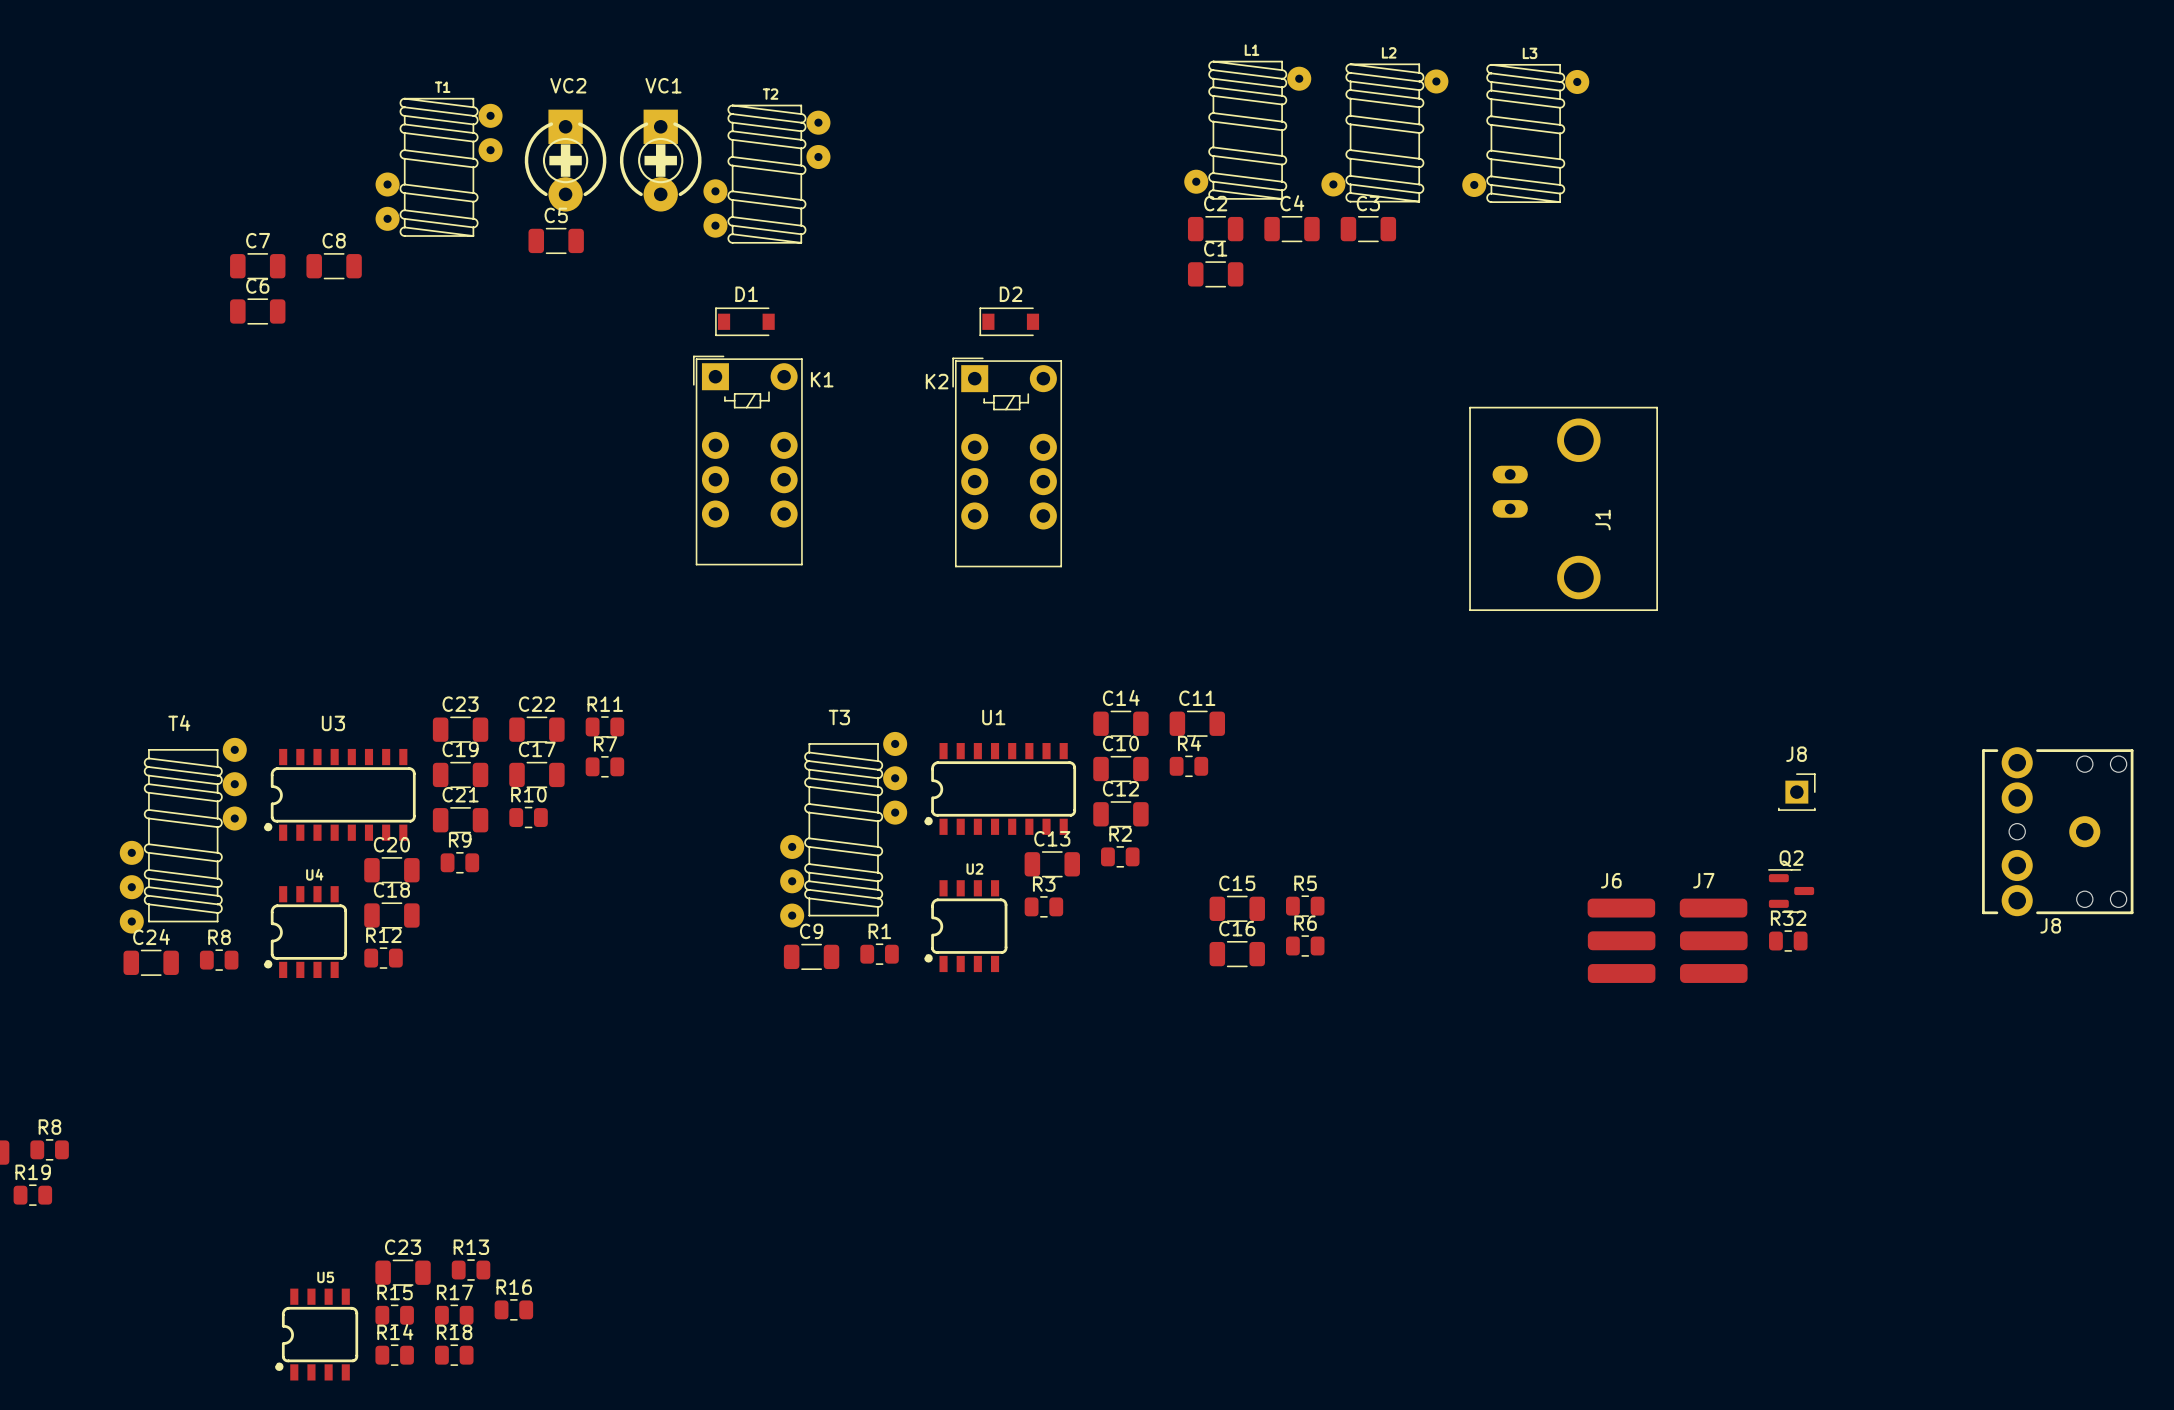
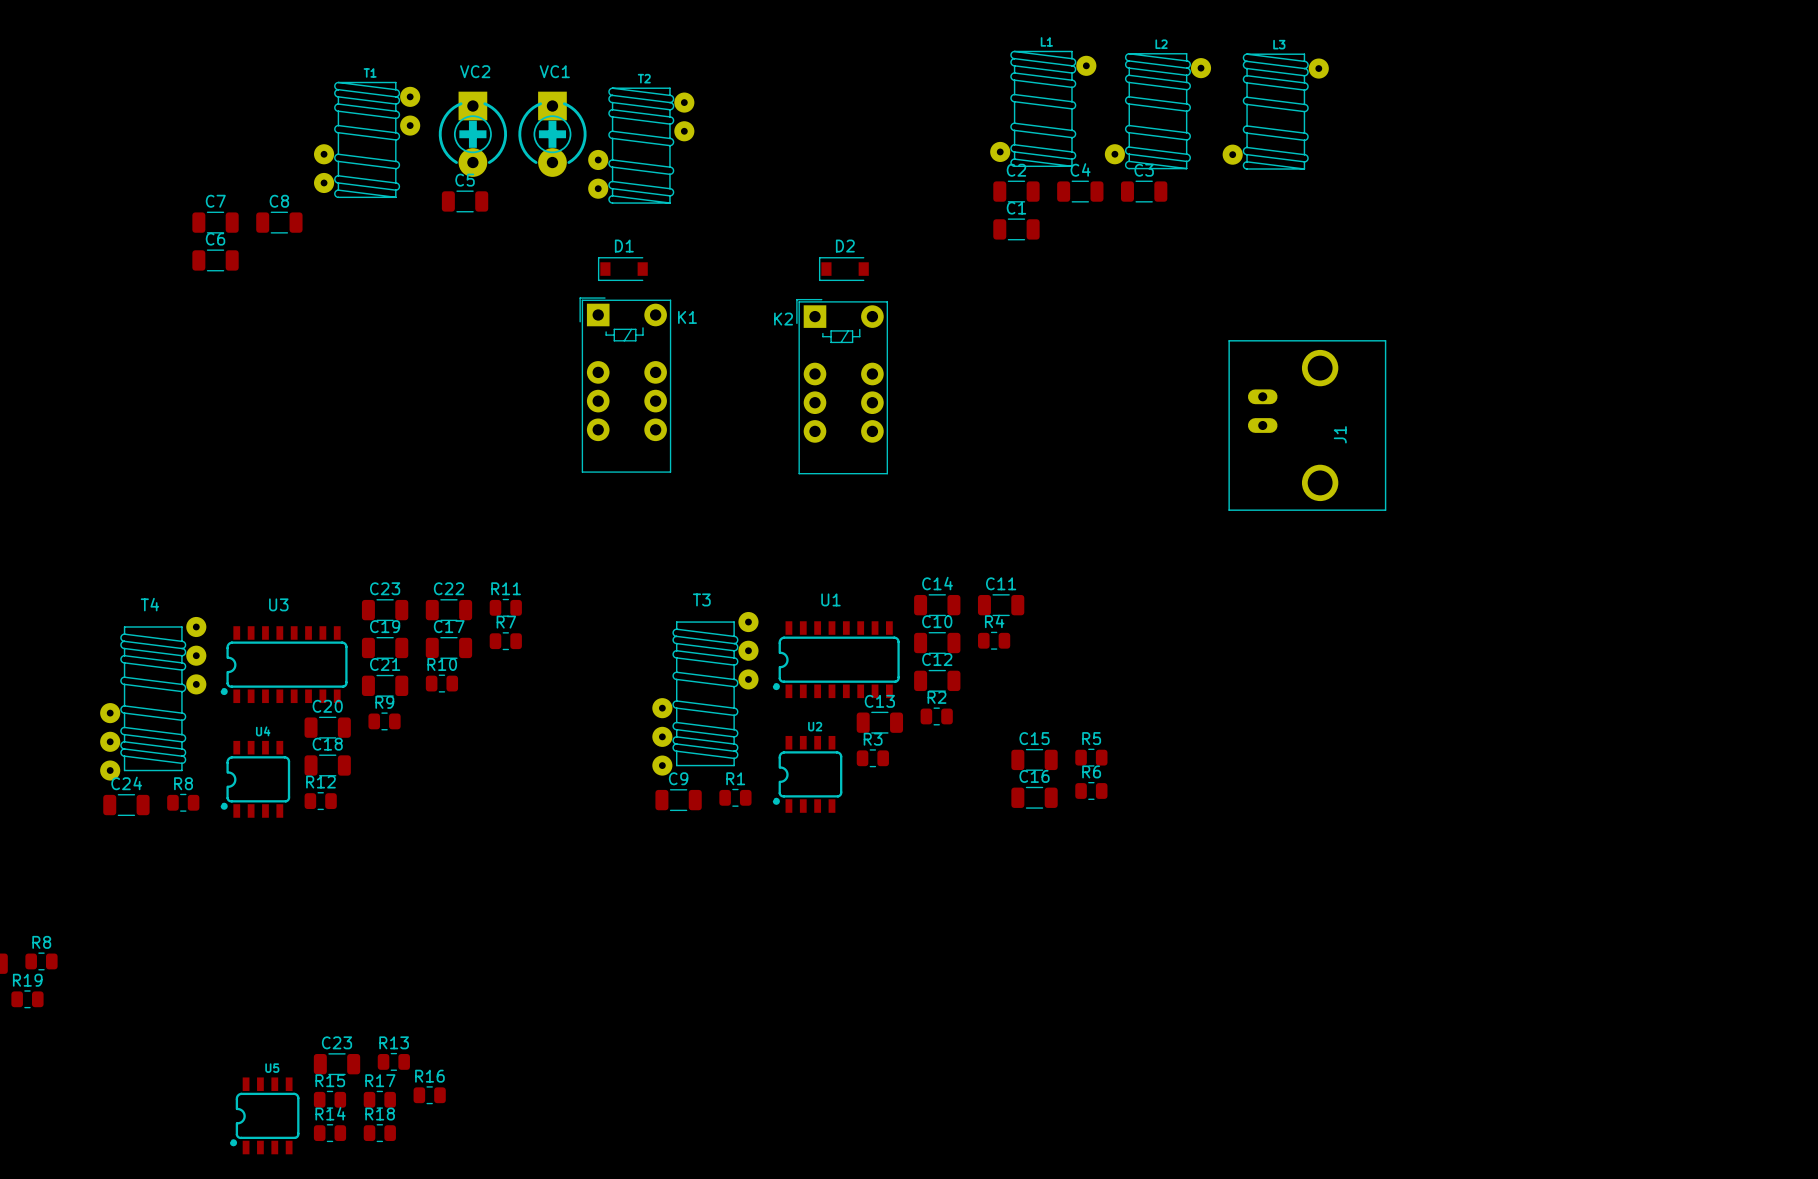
J8: (1796, 792) -> none
J8: (2057, 831) -> none
Q2: (1791, 891) -> none
J6: (1621, 940) -> none
J7: (1713, 940) -> none
R32: (1788, 941) -> none

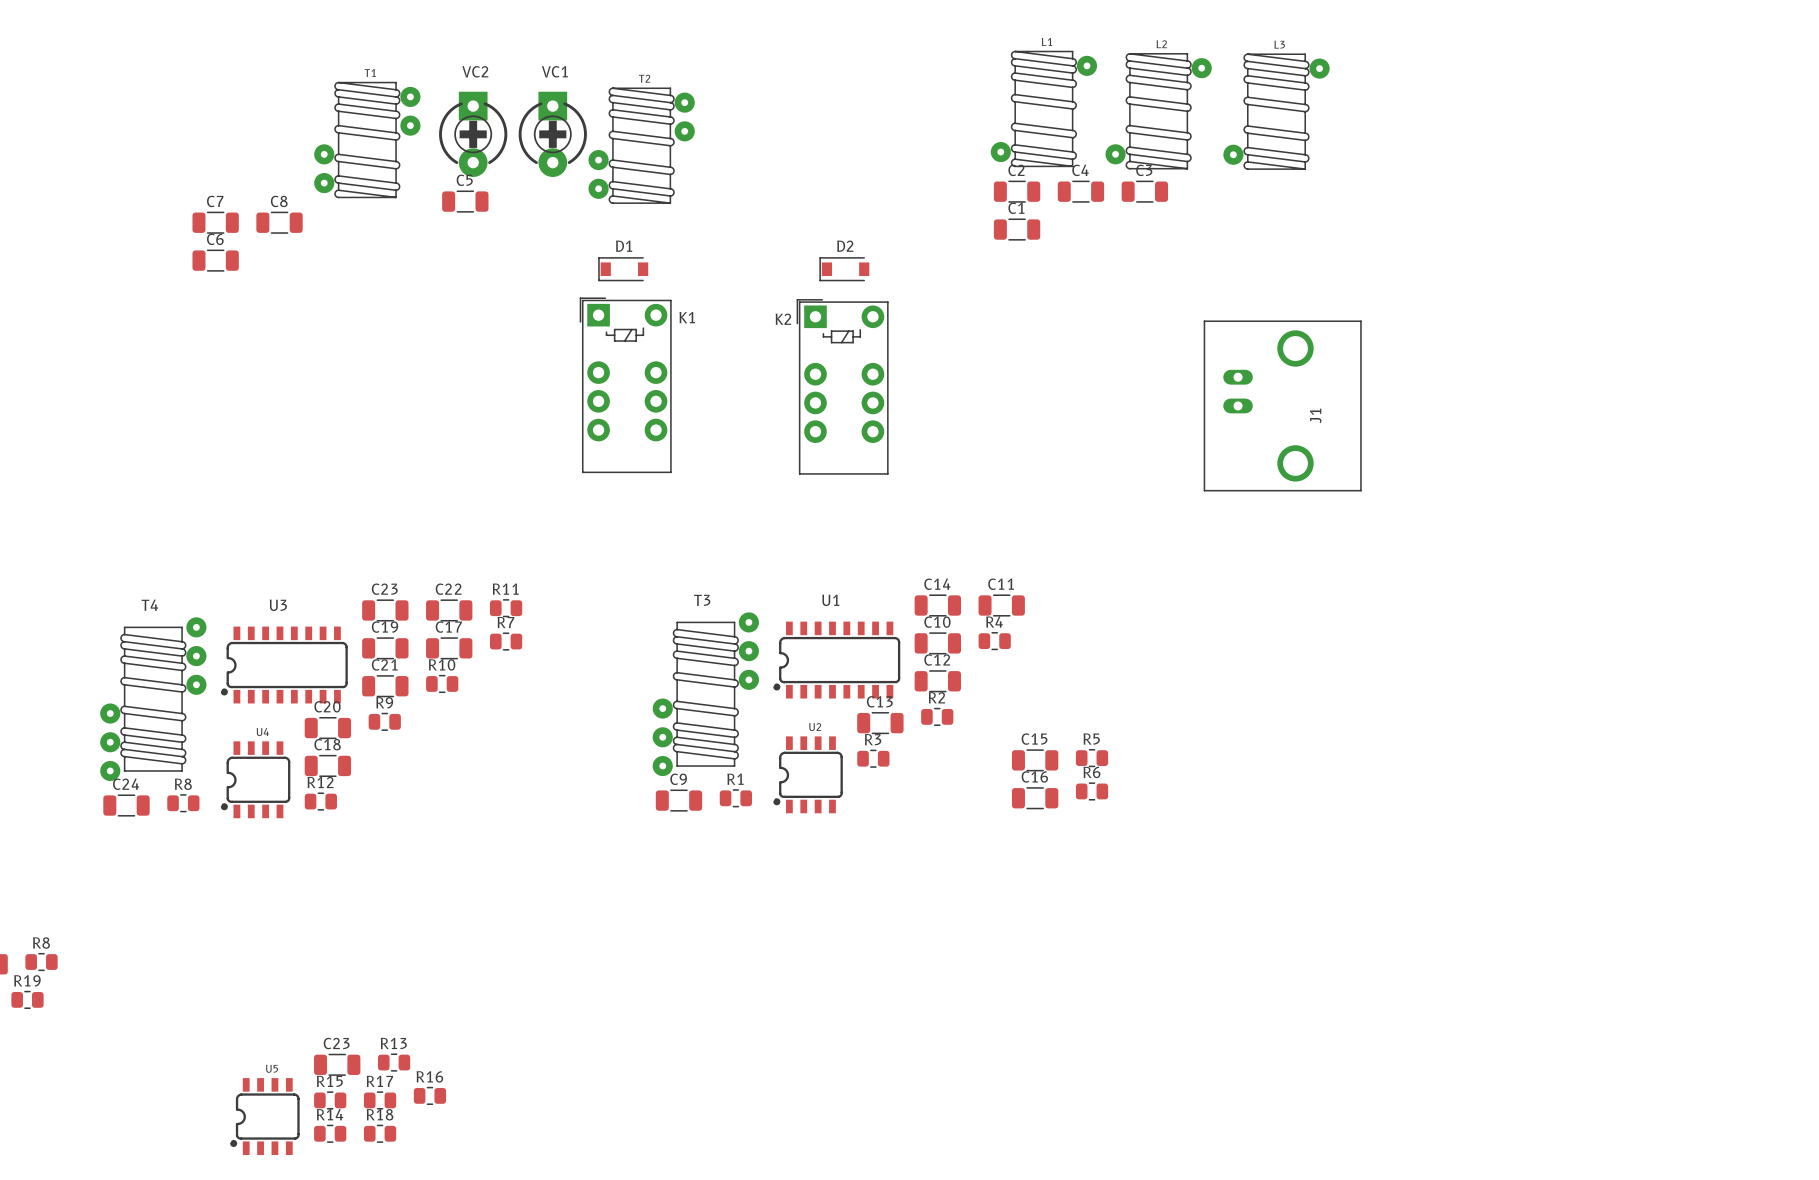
J1 position: (1307, 425) -> (1282, 405)

